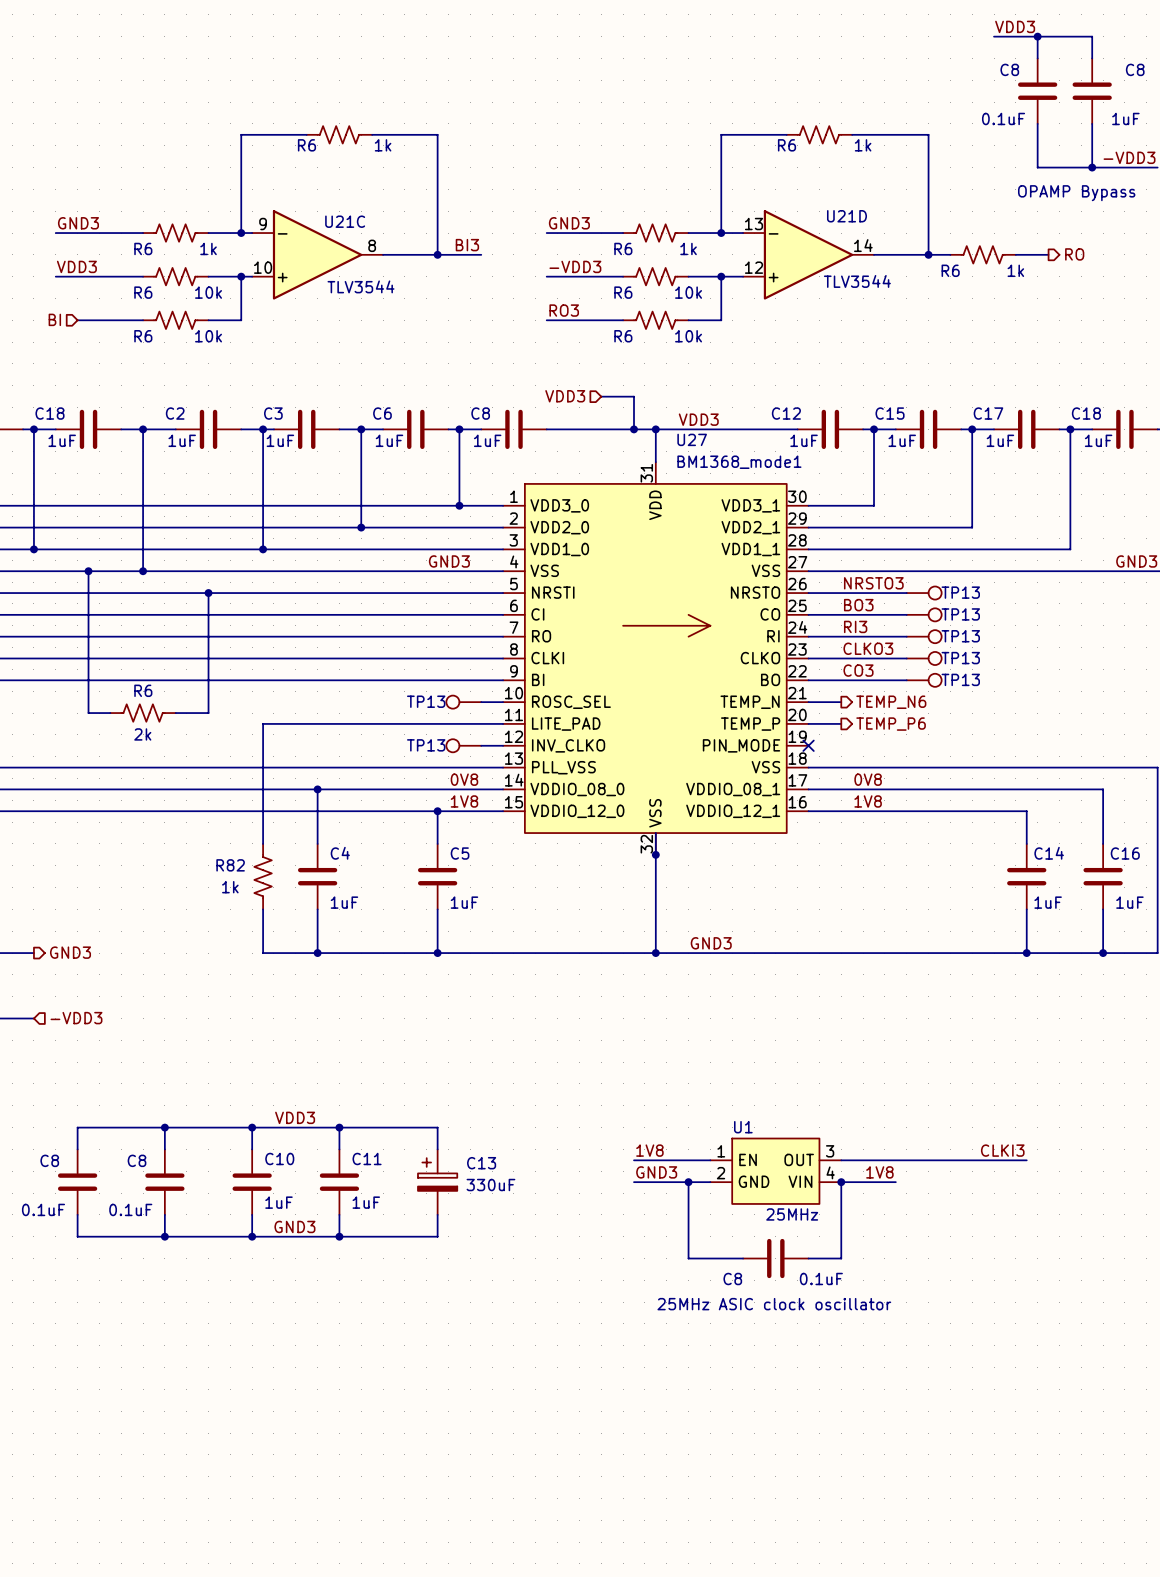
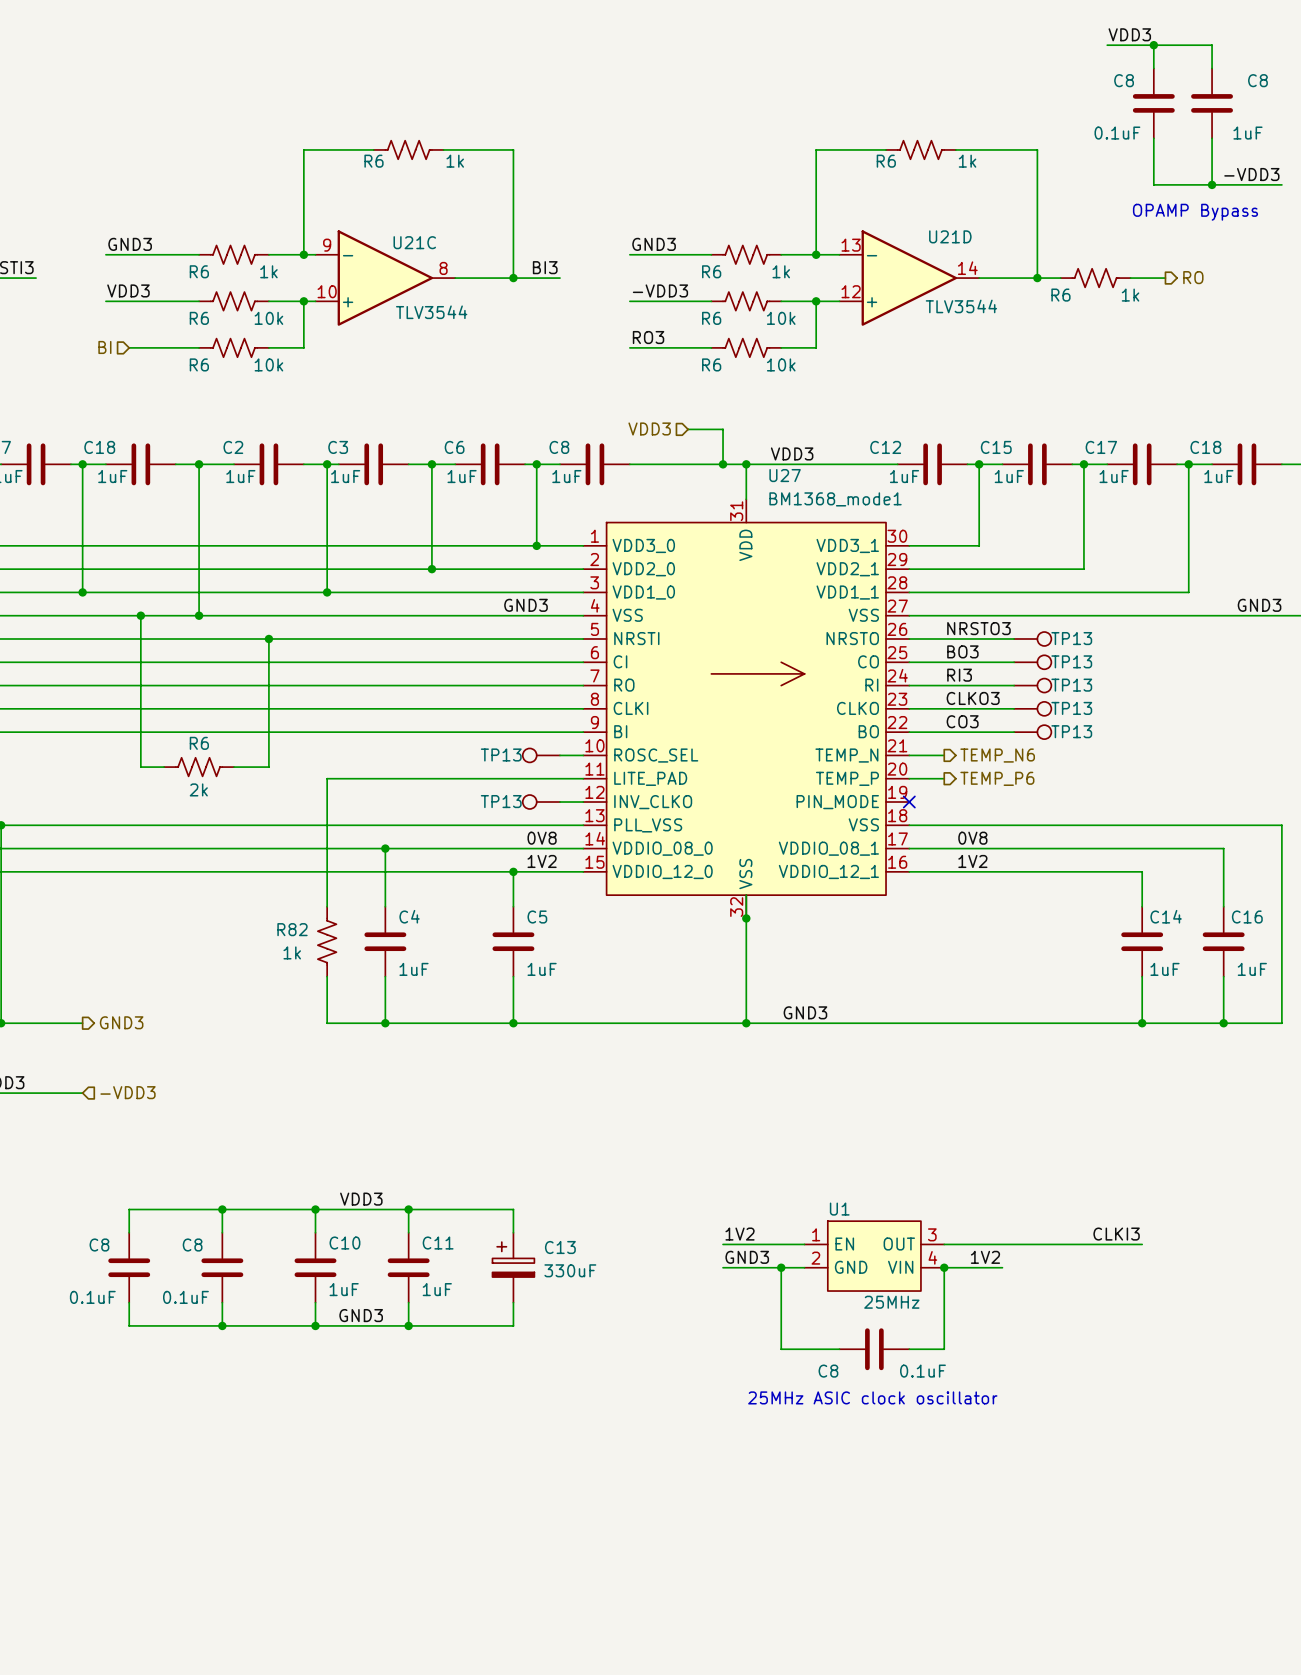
label: 1V8 (464, 801) -> 1V2 (542, 861)
label: 1V8 (868, 801) -> 1V2 (972, 861)
label: 1V8 (649, 1150) -> 1V2 (740, 1234)
label: 1V8 (879, 1172) -> 1V2 (985, 1257)

